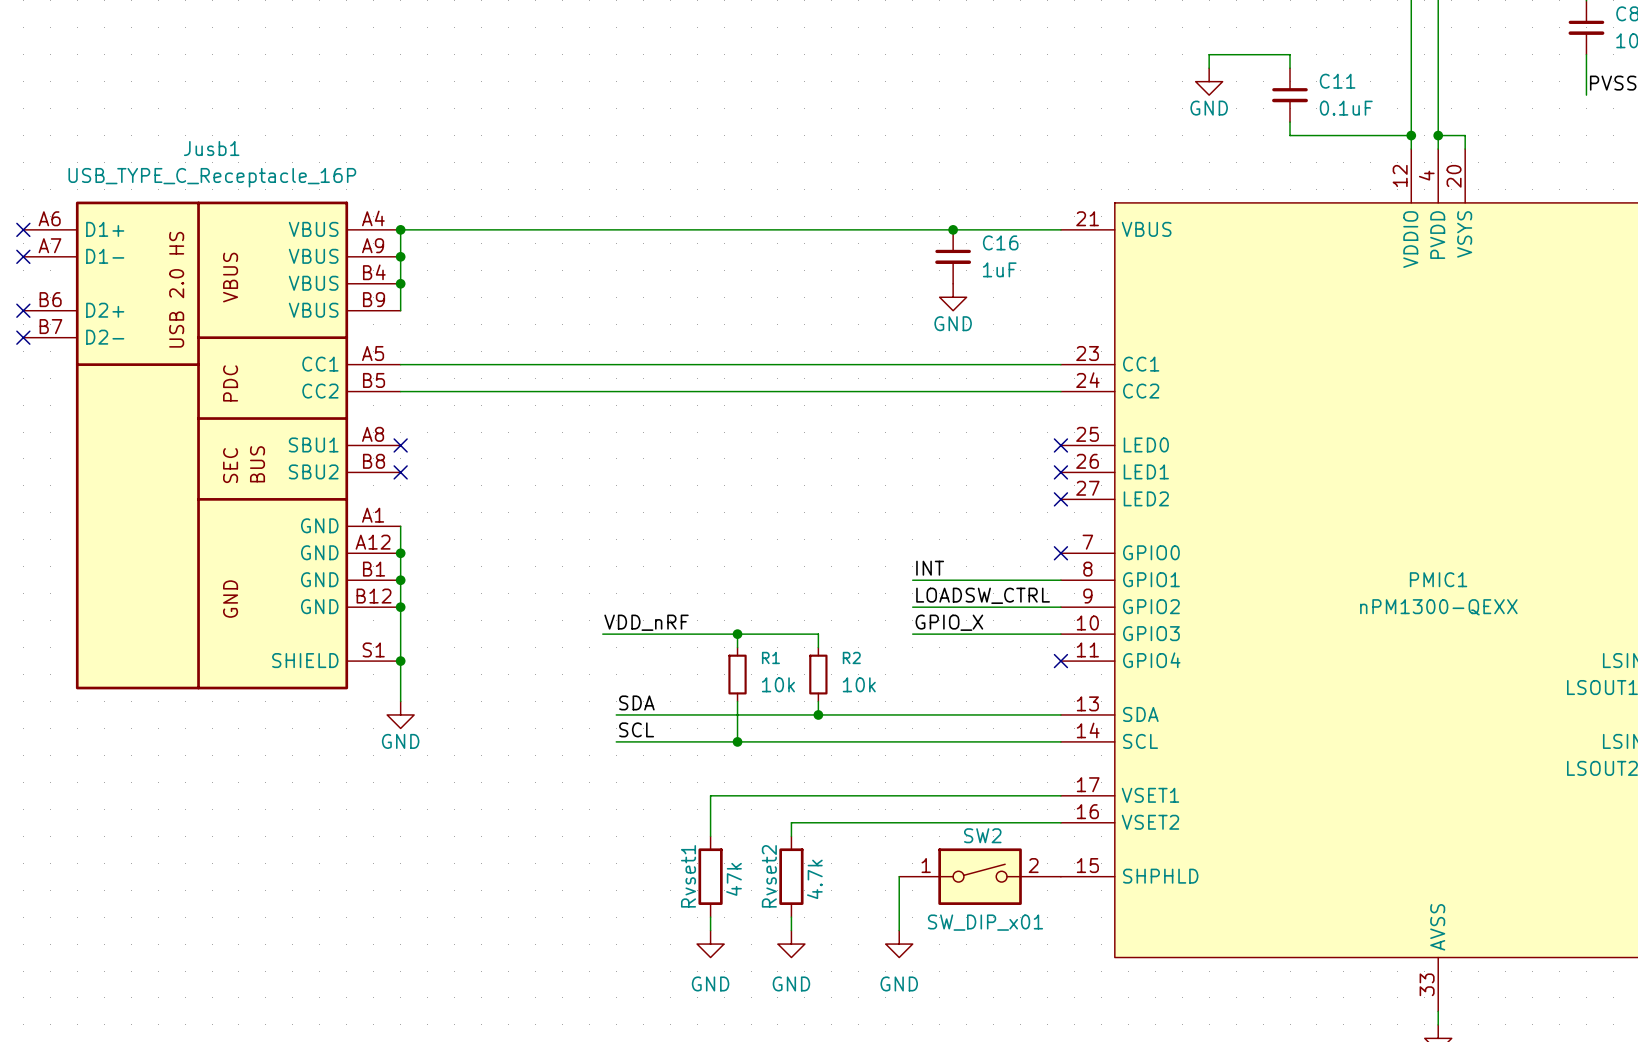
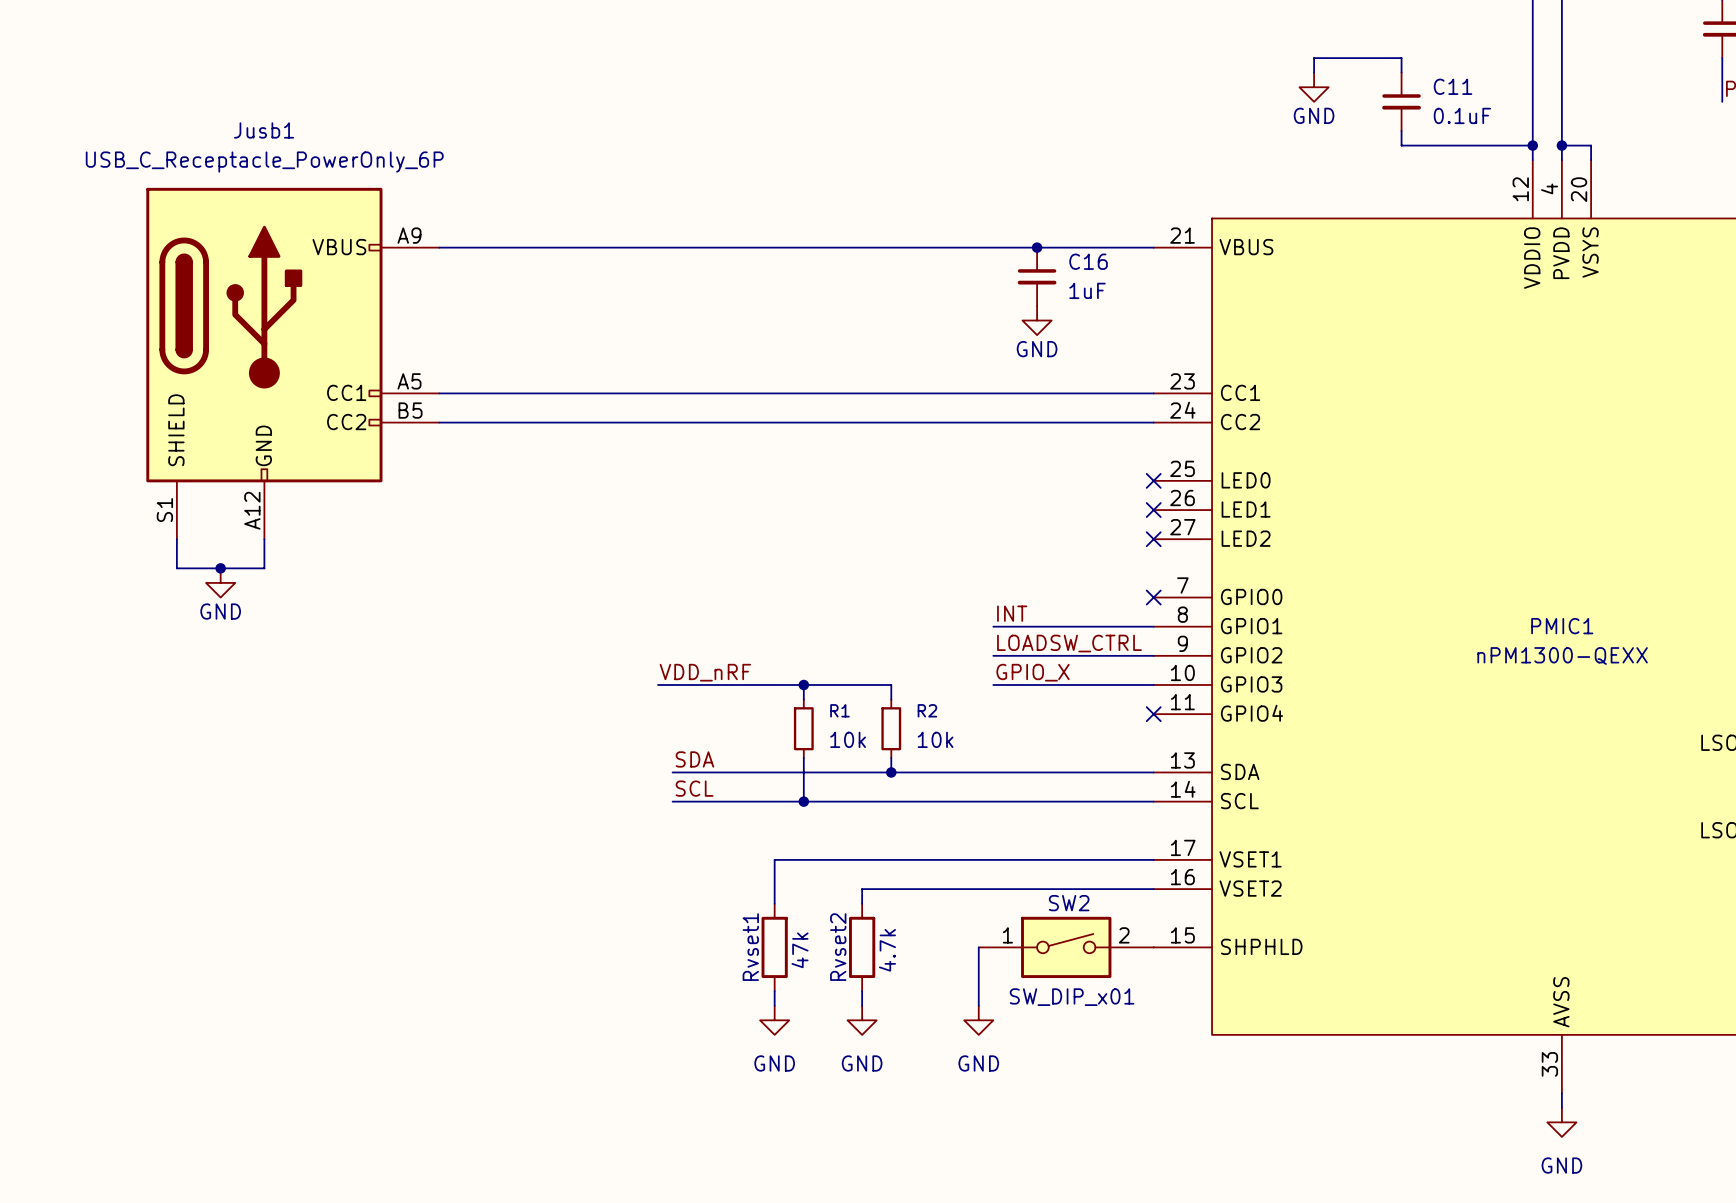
Jusb1 name position: Jusb1 (211, 148) -> Jusb1 (264, 130)
Jusb1 value: USB_TYPE_C_Receptacle_16P (212, 177) -> USB_C_Receptacle_PowerOnly_6P (264, 162)
Jusb1 symbol: [23, 201, 401, 690] -> [146, 187, 440, 540]
no-connect mark: (23, 229) -> none
wire: (400, 229) (400, 310) -> none
junction: (400, 229) -> none
no-connect mark: (23, 256) -> none
junction: (400, 256) -> none
junction: (400, 283) -> none
no-connect mark: (23, 310) -> none
no-connect mark: (23, 337) -> none
no-connect mark: (400, 445) -> none
no-connect mark: (400, 472) -> none
junction: none -> (220, 568)
wire: (400, 526) (400, 701) -> none
power symbol: none -> GND (220, 582)
junction: (400, 553) -> none
junction: (400, 580) -> none
junction: (400, 607) -> none
junction: (400, 661) -> none
power symbol: GND (400, 714) -> none

